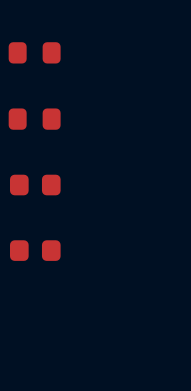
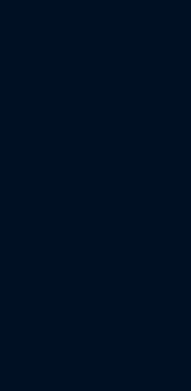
part: (34, 52) -> none
part: (34, 119) -> none
part: (35, 185) -> none
part: (35, 250) -> none

